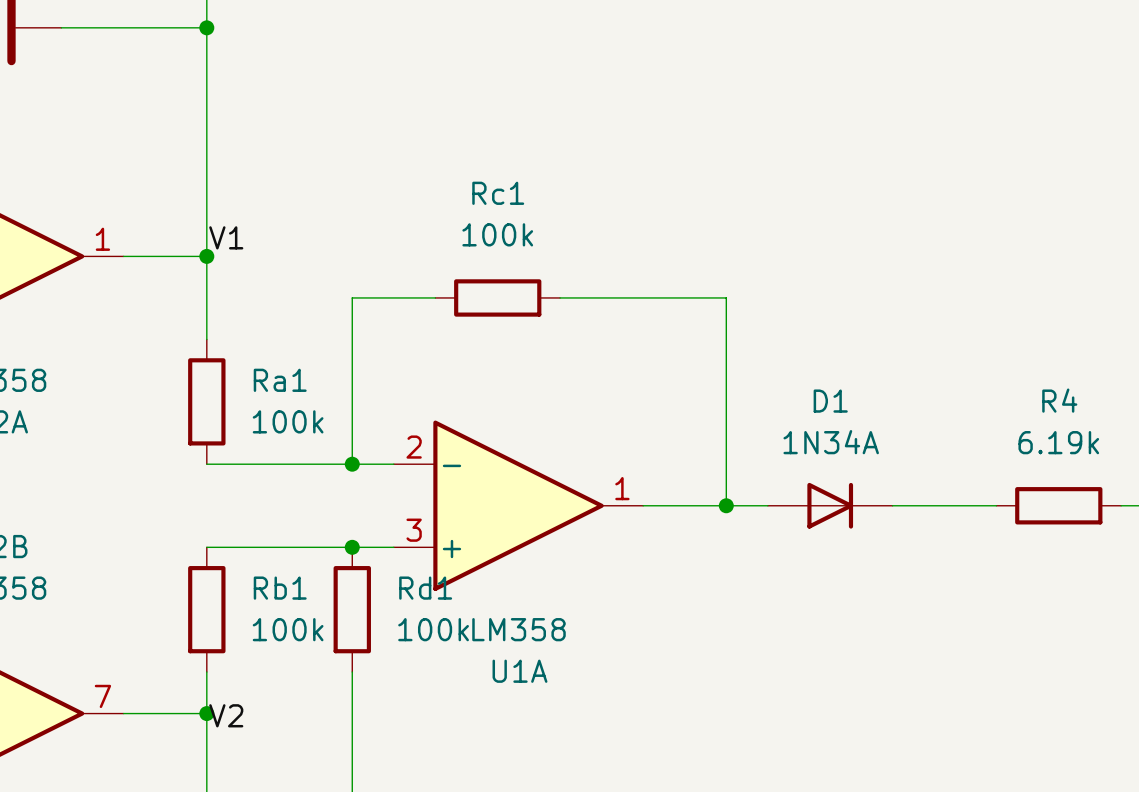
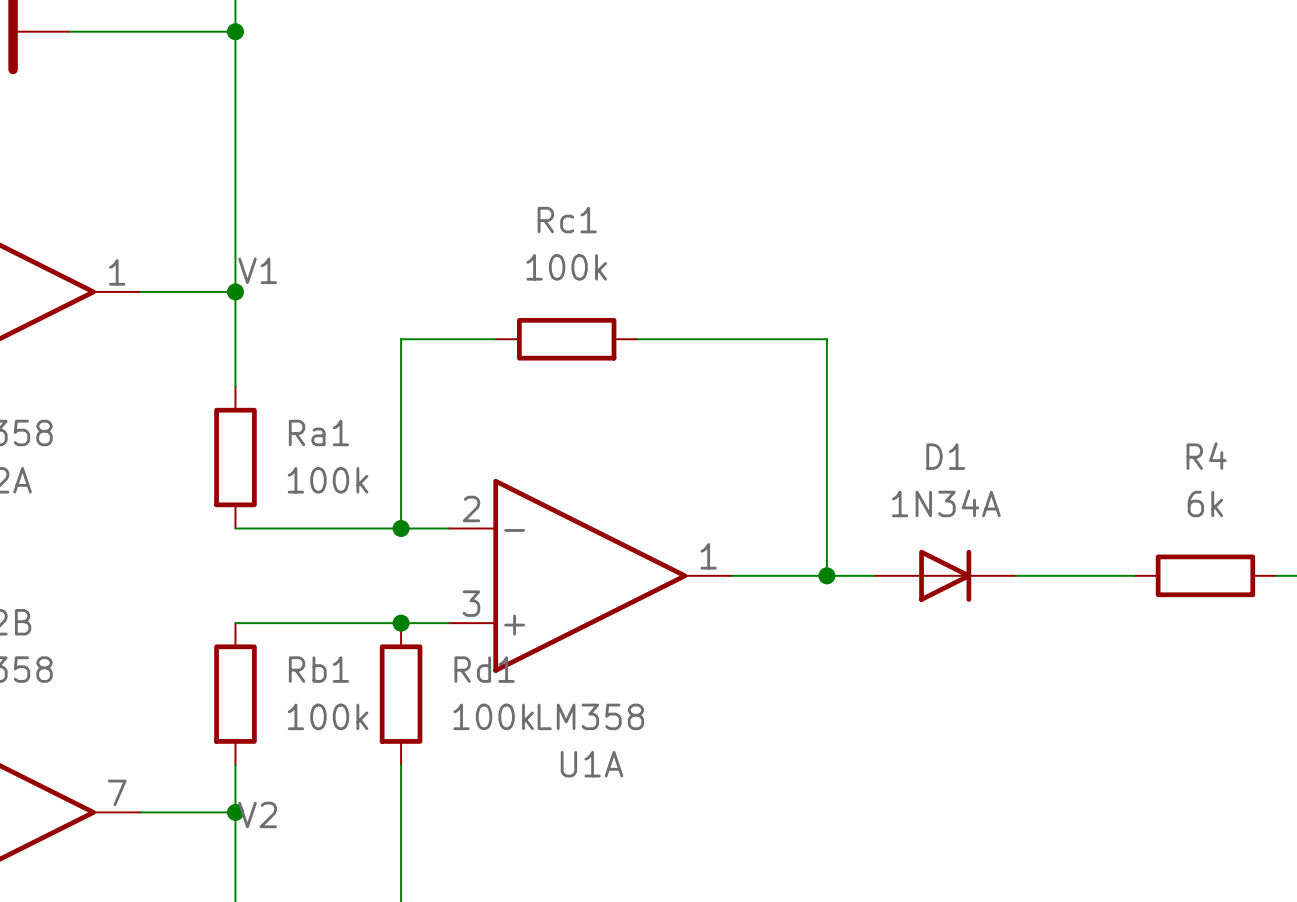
R4 value: 6.19k (1058, 442) -> 6k (1205, 503)

